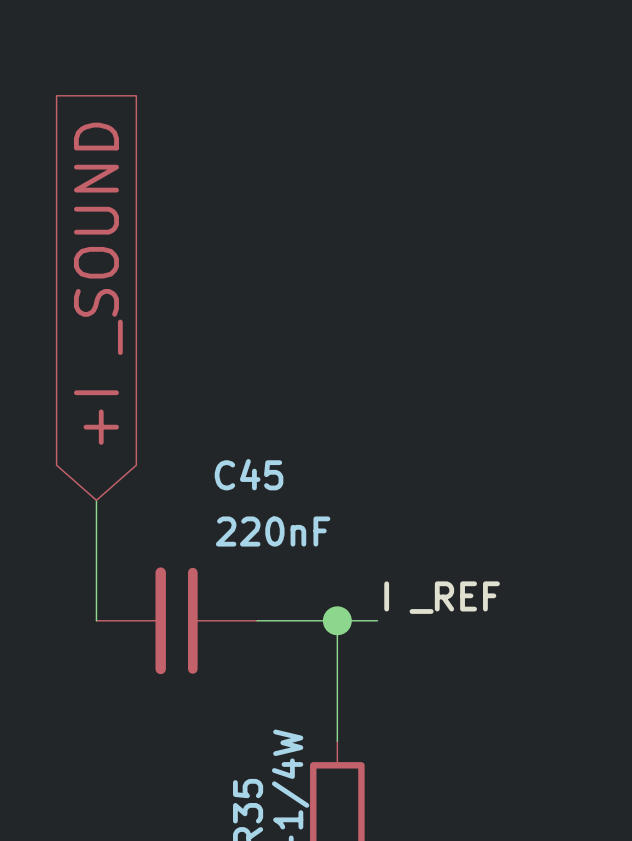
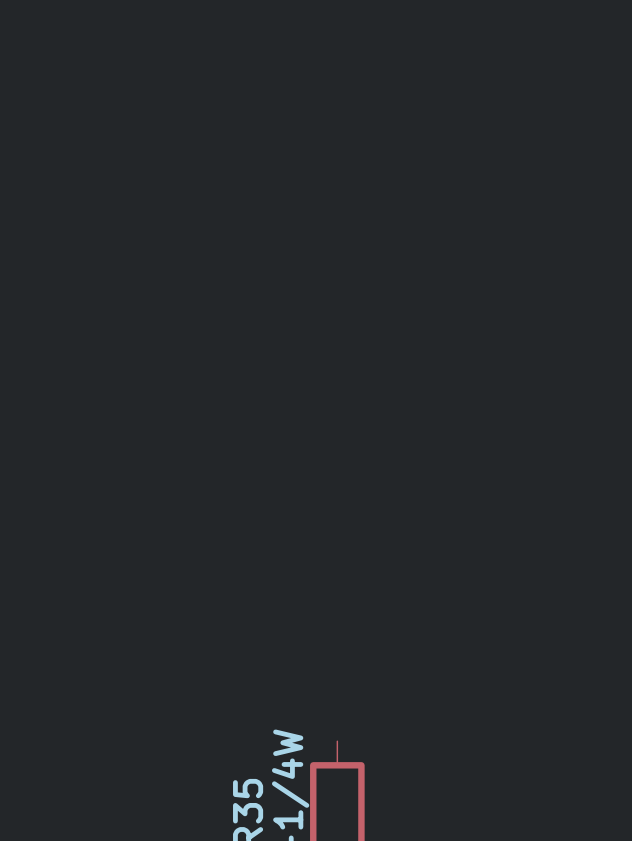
global label: +I _SOUND (98, 283) -> none
wire: (96, 500) (96, 620) -> none
label: I _REF (442, 597) -> none
C45: 220nF (176, 620) -> none
wire: (257, 620) (377, 620) -> none
wire: (337, 620) (337, 741) -> none
junction: (337, 620) -> none

